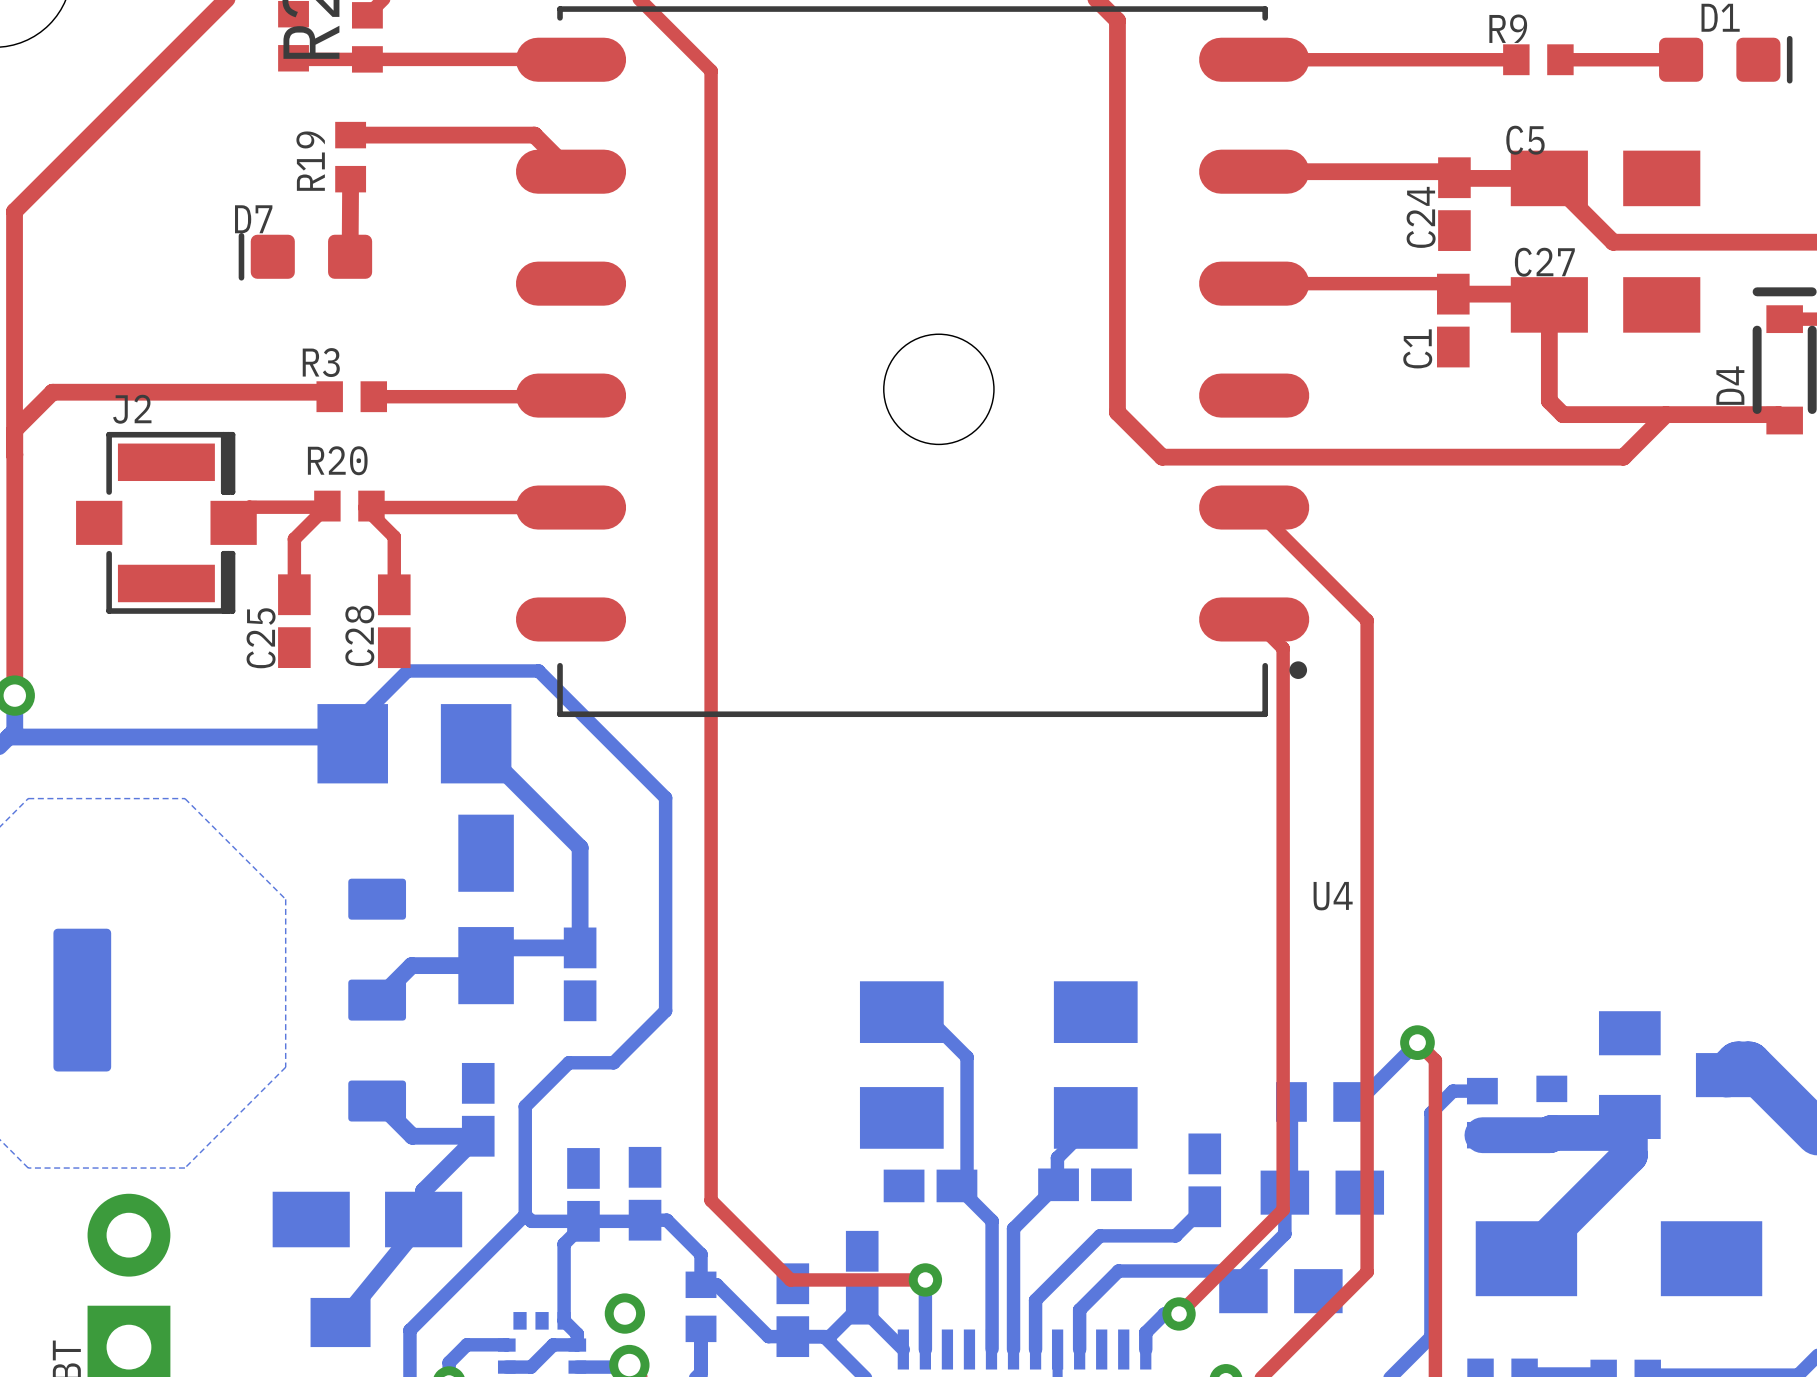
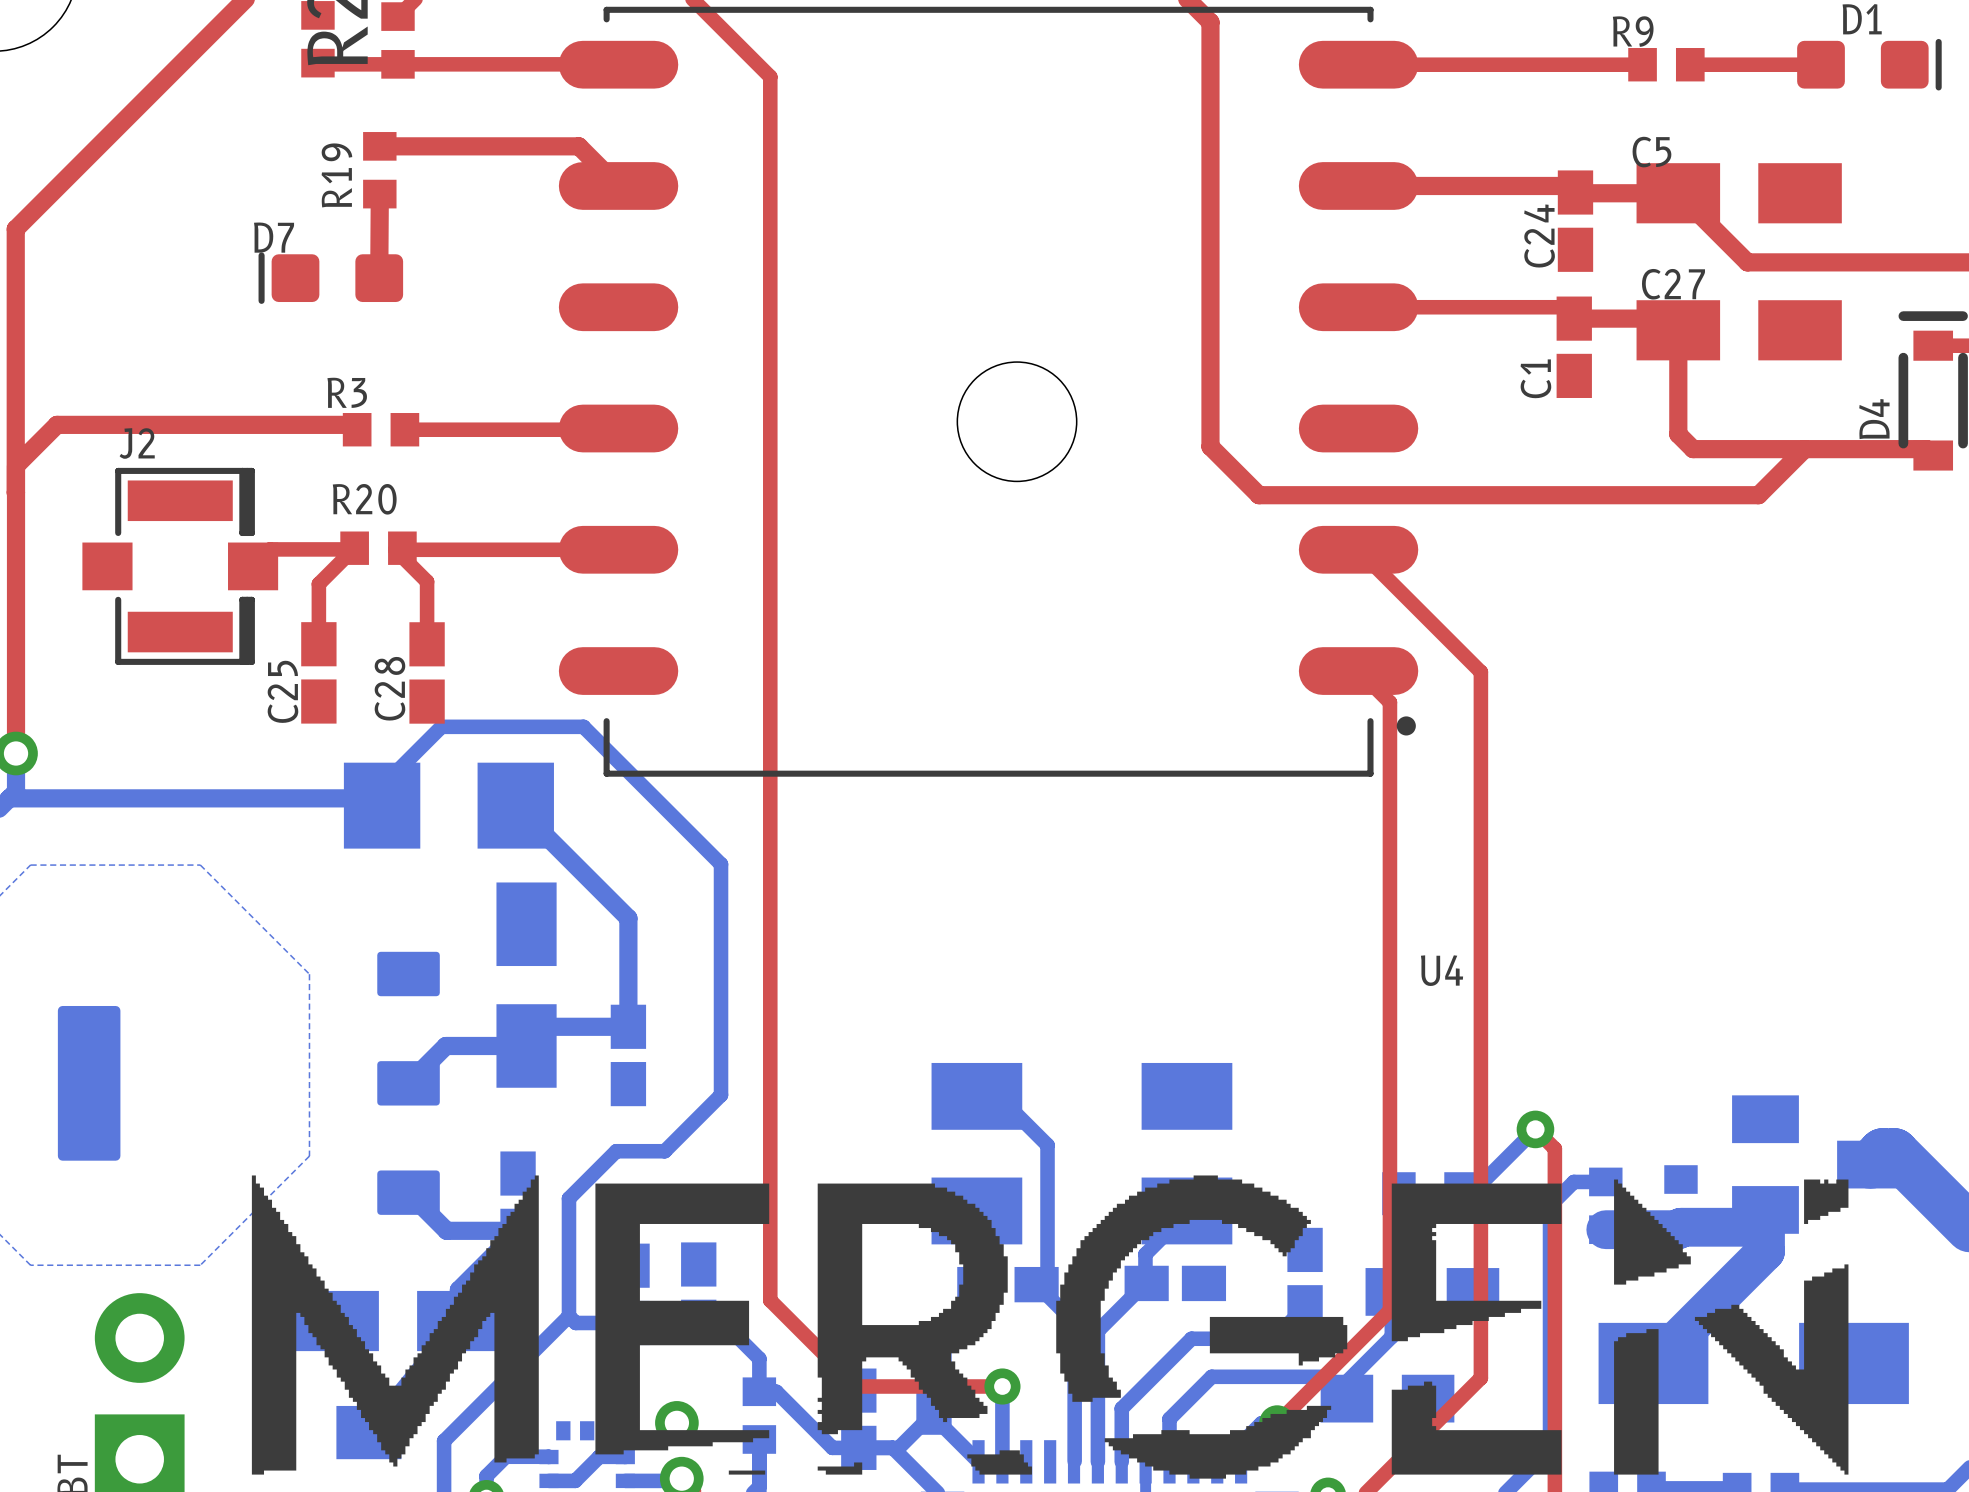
drawing: none -> [251, 1175, 1849, 1479]

